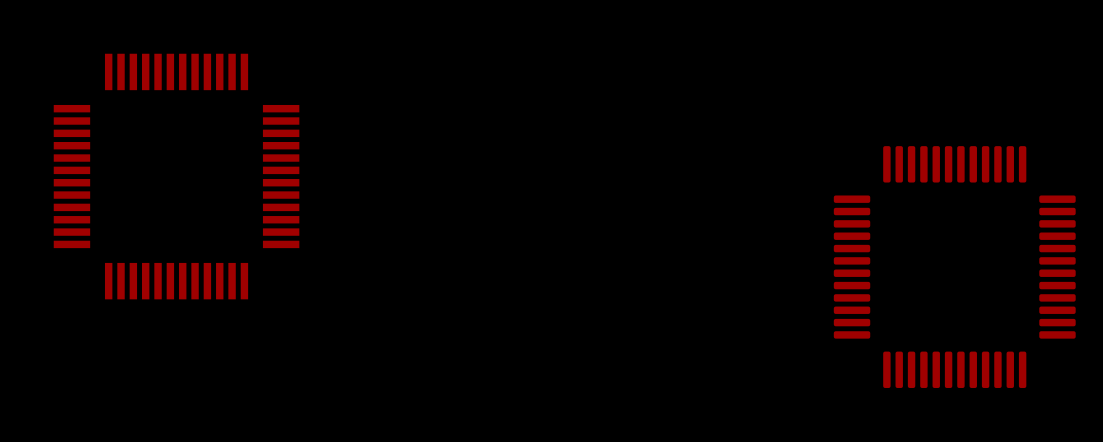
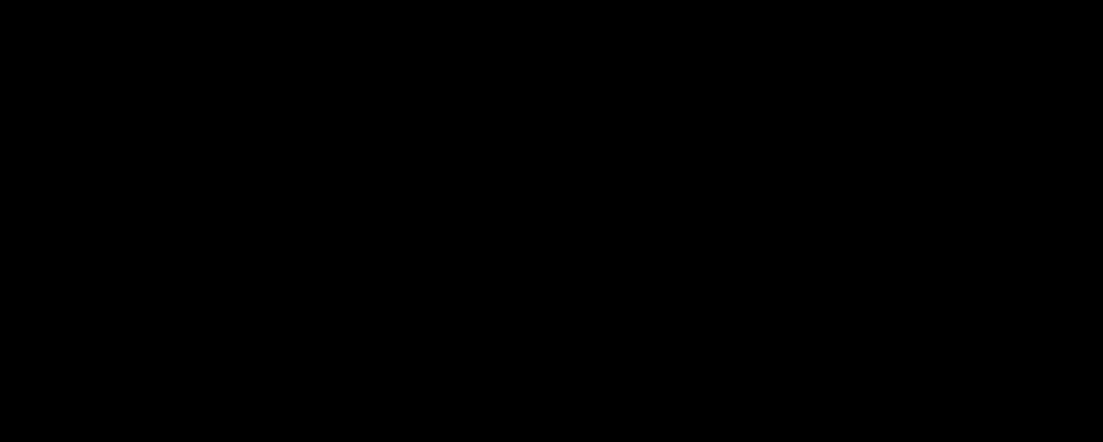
part: (176, 176) -> none
part: (954, 267) -> none

